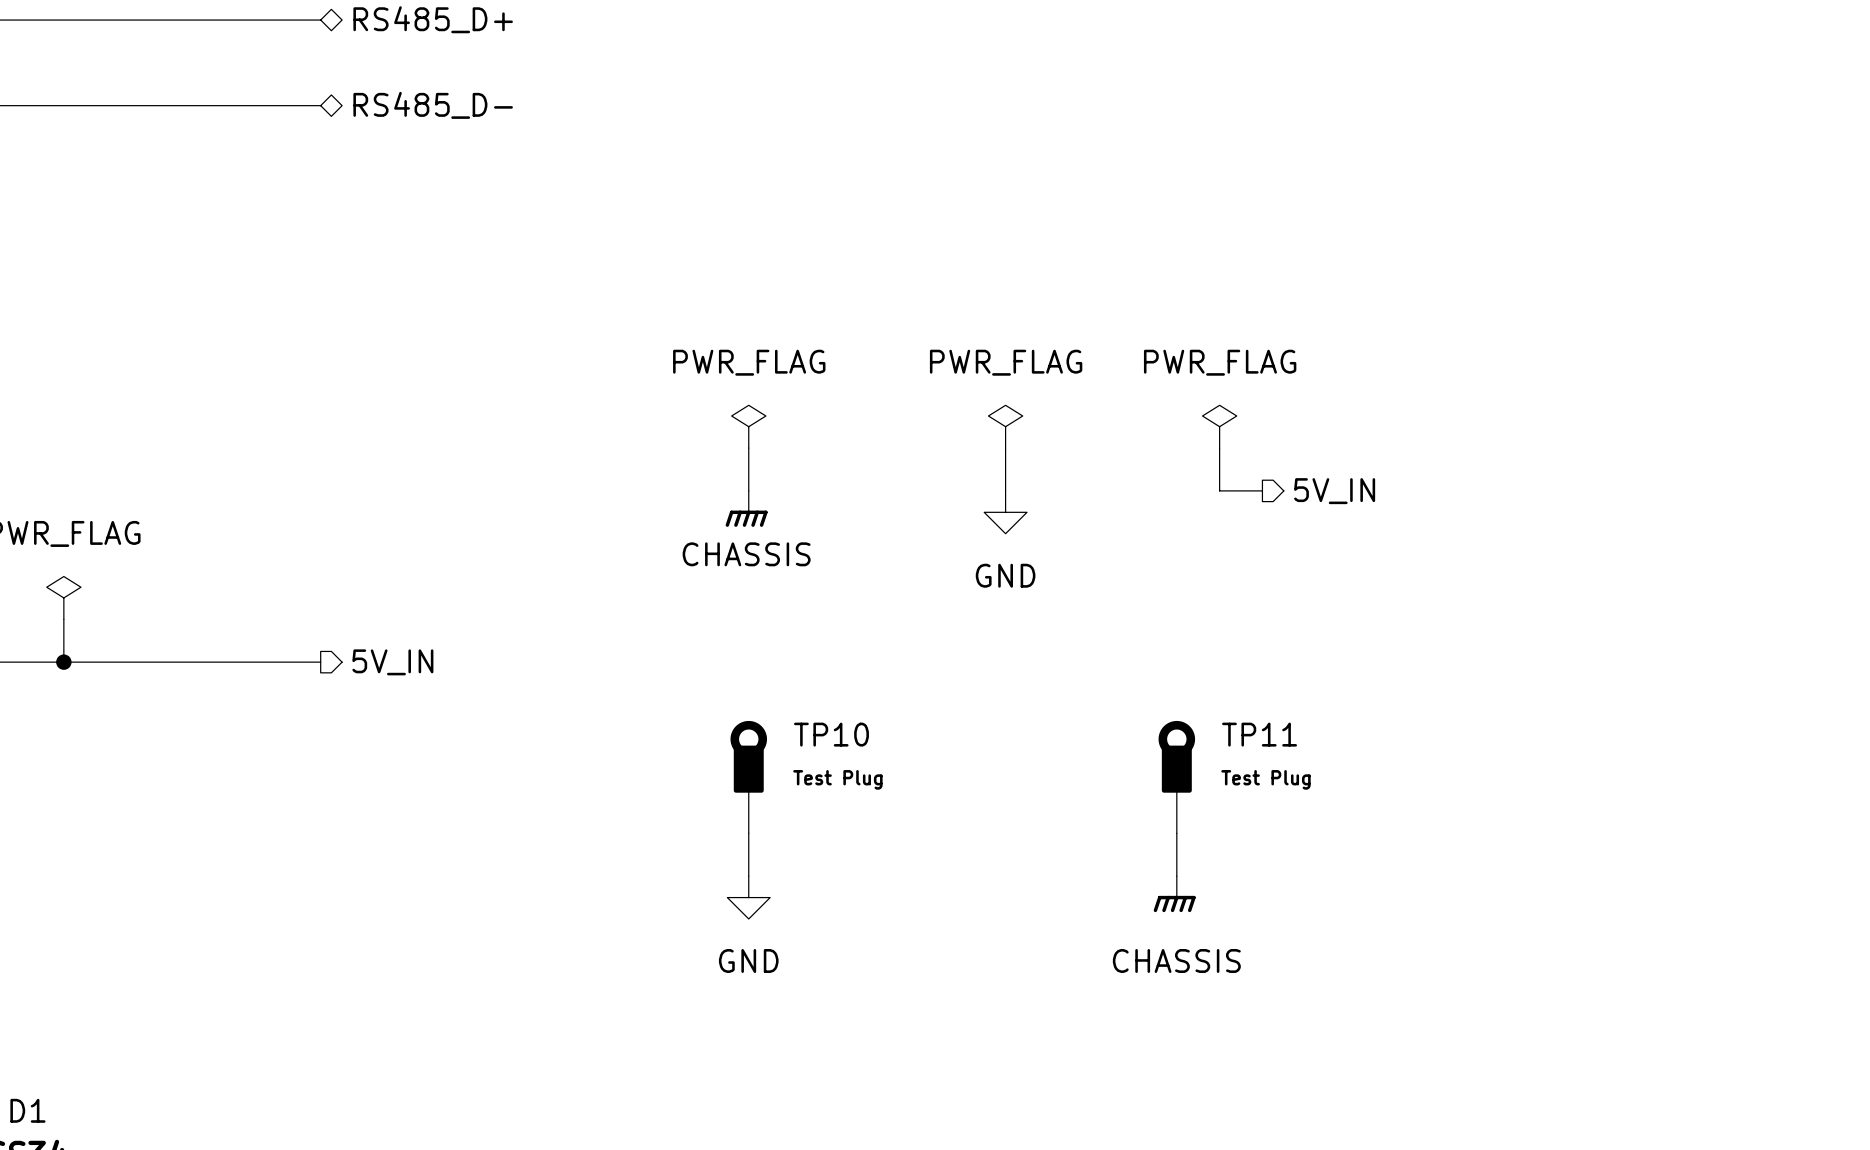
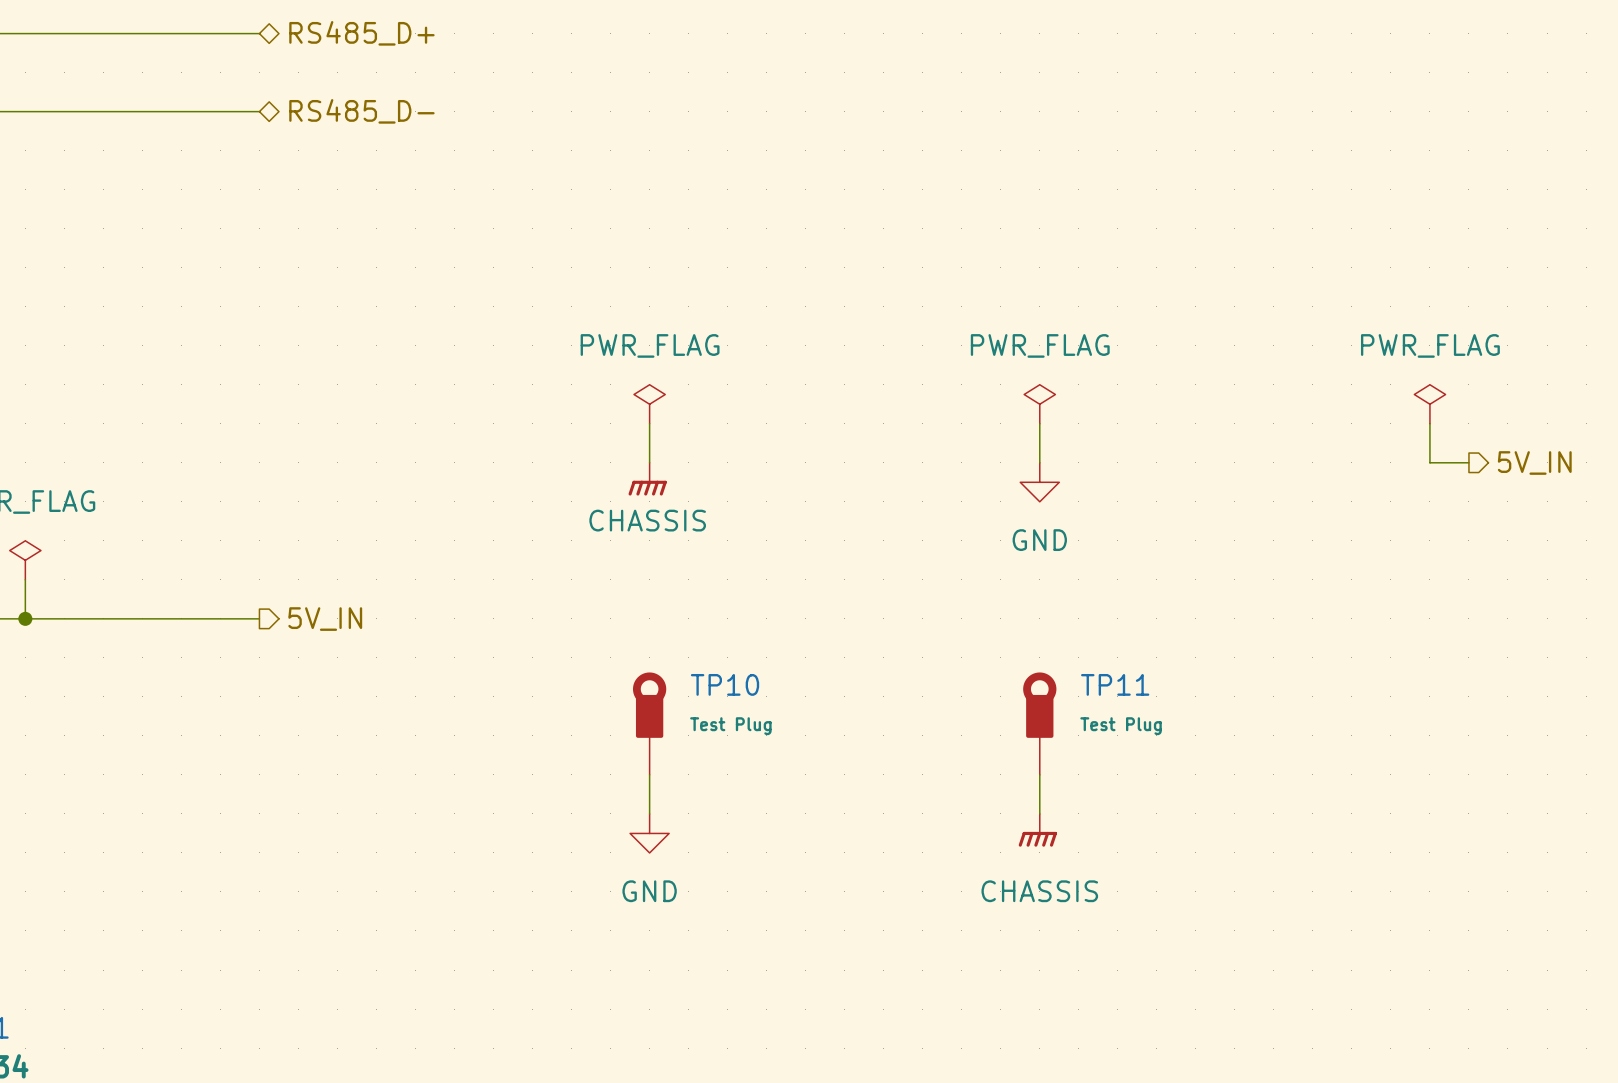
power symbol: PWR_FLAG (1005, 426) -> none
power symbol position: PWR_FLAG (1219, 426) -> PWR_FLAG (1039, 404)
power symbol: none -> PWR_FLAG (1429, 404)
wire: (1005, 448) (1005, 490) -> (1039, 423) (1039, 462)
wire: (1219, 448) (1219, 490) (1262, 490) -> (1429, 423) (1429, 462) (1468, 462)
hierarchical label position: 5V_IN (1334, 491) -> 5V_IN (1534, 462)
power symbol position: GND (1005, 512) -> GND (1039, 482)

